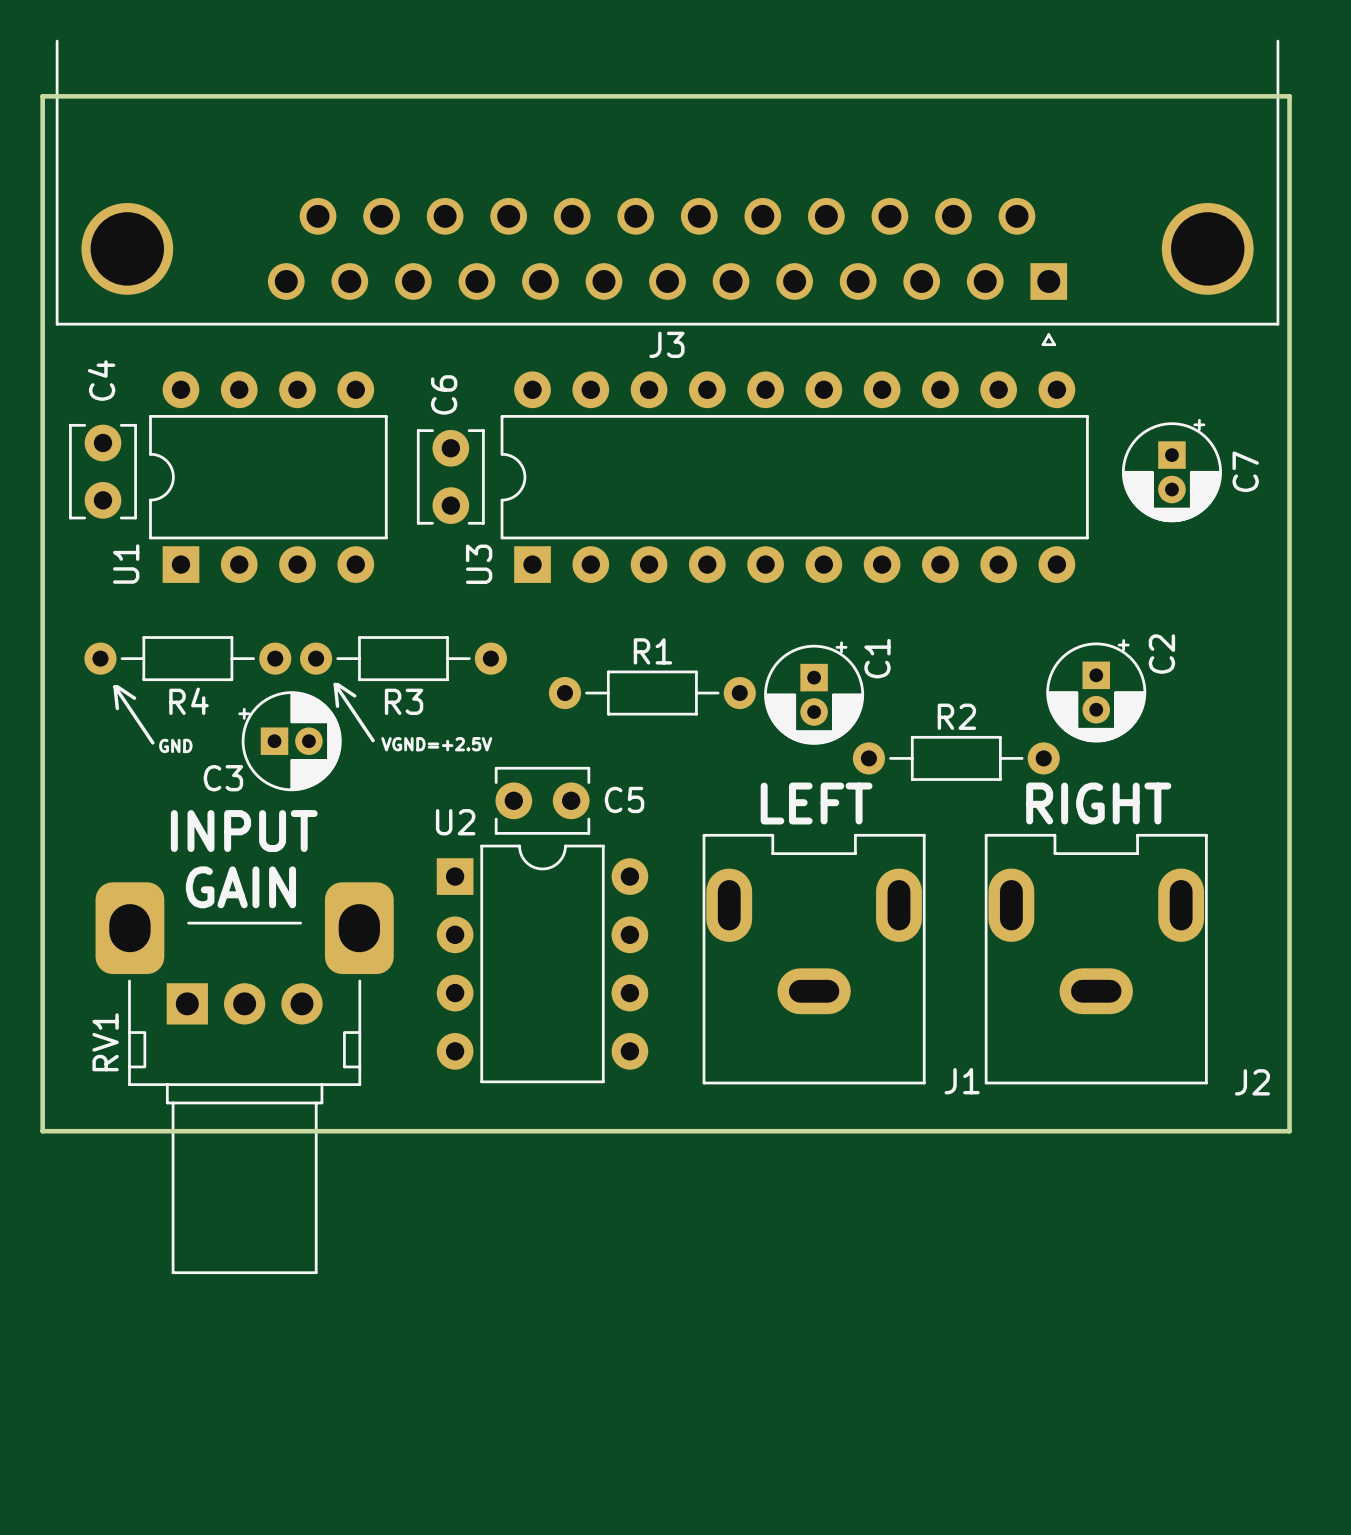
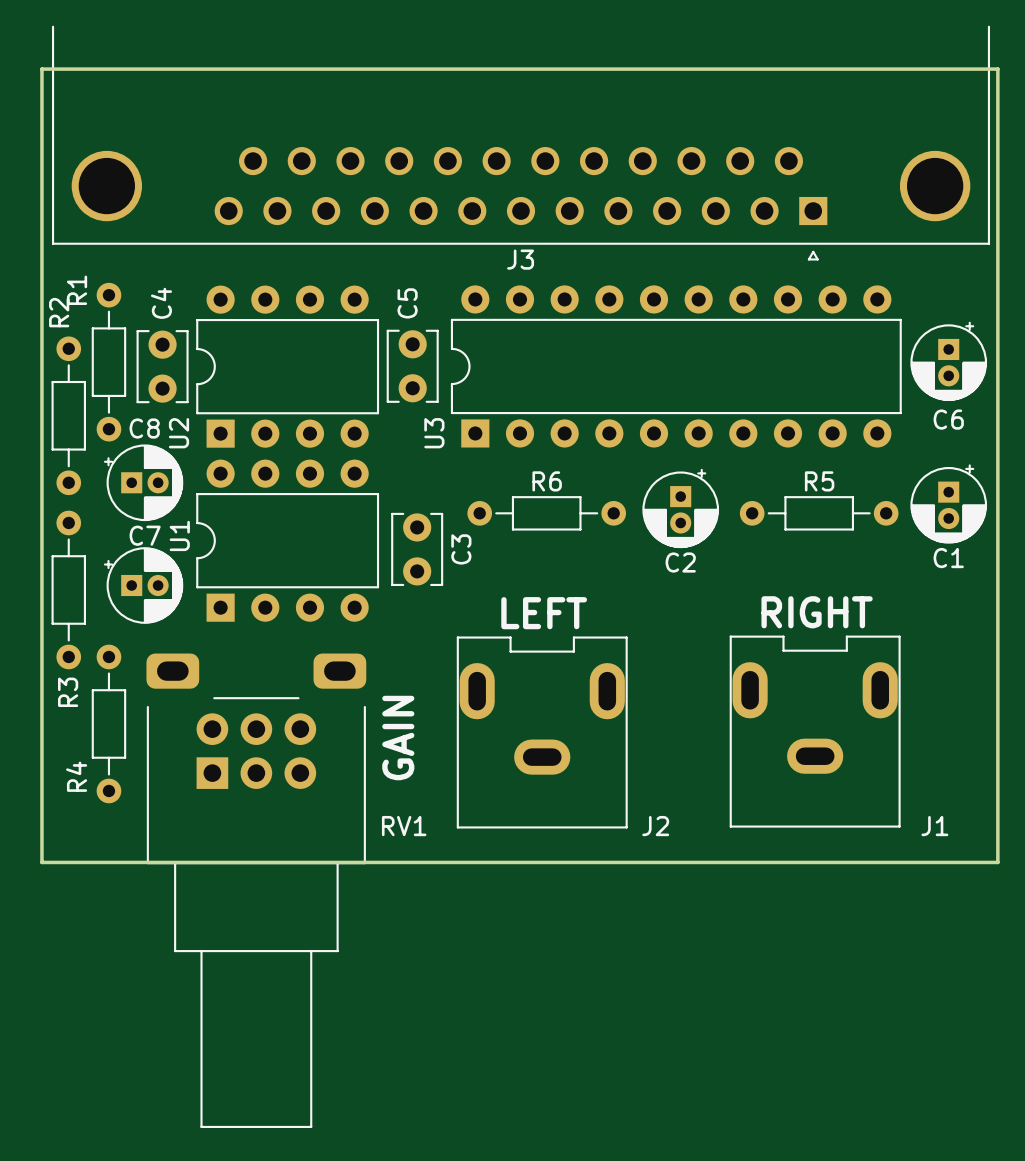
C4 name position: C4 (101, 380) -> C4 (161, 303)
C6 name position: C6 (444, 394) -> C6 (948, 419)
C6 footprint: [416, 429, 485, 525] -> [910, 321, 988, 401]
C7 rotation: 0° (1171, 470) -> 90° counterclockwise (143, 585)
C7 position: (1171, 470) -> (143, 585)
C4 position: (102, 471) -> (162, 366)
U1 position: (268, 477) -> (287, 540)
U3 position: (794, 477) -> (676, 366)
U1 name position: U1 (126, 564) -> U1 (179, 535)
C8: none -> (143, 482)
R1 name position: R1 (652, 651) -> R1 (77, 290)
C2 name rotation: 0° (1161, 654) -> 90° clockwise (680, 562)
C2 name position: C2 (1161, 654) -> C2 (680, 562)
R4 rotation: 0° (187, 658) -> 90° clockwise (108, 723)
R4 position: (187, 658) -> (108, 723)
R3 rotation: 0° (403, 658) -> 90° clockwise (68, 589)
R3 position: (403, 658) -> (68, 589)
C1 name rotation: 0° (877, 658) -> 90° clockwise (948, 558)
C1 name position: C1 (877, 658) -> C1 (948, 558)
R6: none -> (546, 513)
R5: none -> (819, 513)
line: (337, 684) (354, 695) -> none
line: (117, 686) (134, 698) -> none
C2 position: (1096, 690) -> (680, 508)
C3 footprint: [238, 691, 342, 792] -> [391, 512, 444, 587]
R1 rotation: 0° (652, 693) -> 90° clockwise (108, 362)
R1 position: (652, 693) -> (108, 362)
C1 position: (814, 693) -> (948, 504)
R4 name position: R4 (188, 701) -> R4 (76, 776)
R3 name position: R3 (404, 701) -> R3 (68, 692)
line: (337, 706) (335, 684) (373, 740) -> none
line: (117, 708) (115, 686) (152, 742) -> none
R2 name position: R2 (956, 716) -> R2 (59, 312)
text: VGND=+2.5V (436, 744) -> none
text: GND (175, 745) -> none
R2 rotation: 0° (956, 758) -> 90° clockwise (68, 415)
R2 position: (956, 758) -> (68, 415)
C3 name position: C3 (223, 778) -> C3 (461, 549)
C5 name position: C5 (624, 799) -> C5 (407, 303)
C5 rotation: 0° (542, 800) -> 90° clockwise (412, 366)
C5 position: (542, 800) -> (412, 366)
J1 value: LEFT (816, 803) -> RIGHT (817, 612)
J2 value: RIGHT (1098, 803) -> LEFT (544, 613)
text: INPUT (244, 831) -> none
RV1 footprint: [95, 882, 394, 1275] -> [146, 653, 367, 1129]
text rotation: 0° (240, 887) -> 90° counterclockwise (398, 738)
text position: GAIN (240, 887) -> GAIN (398, 738)
J1 position: (814, 959) -> (815, 731)
J2 position: (1096, 959) -> (542, 732)
U2 rotation: 0° (542, 963) -> 90° counterclockwise (287, 366)
U2 position: (542, 963) -> (287, 366)
RV1 name position: RV1 (105, 1042) -> RV1 (404, 826)
J1 name position: J1 (962, 1081) -> J1 (934, 826)
J2 name position: J2 (1252, 1082) -> J2 (655, 826)

